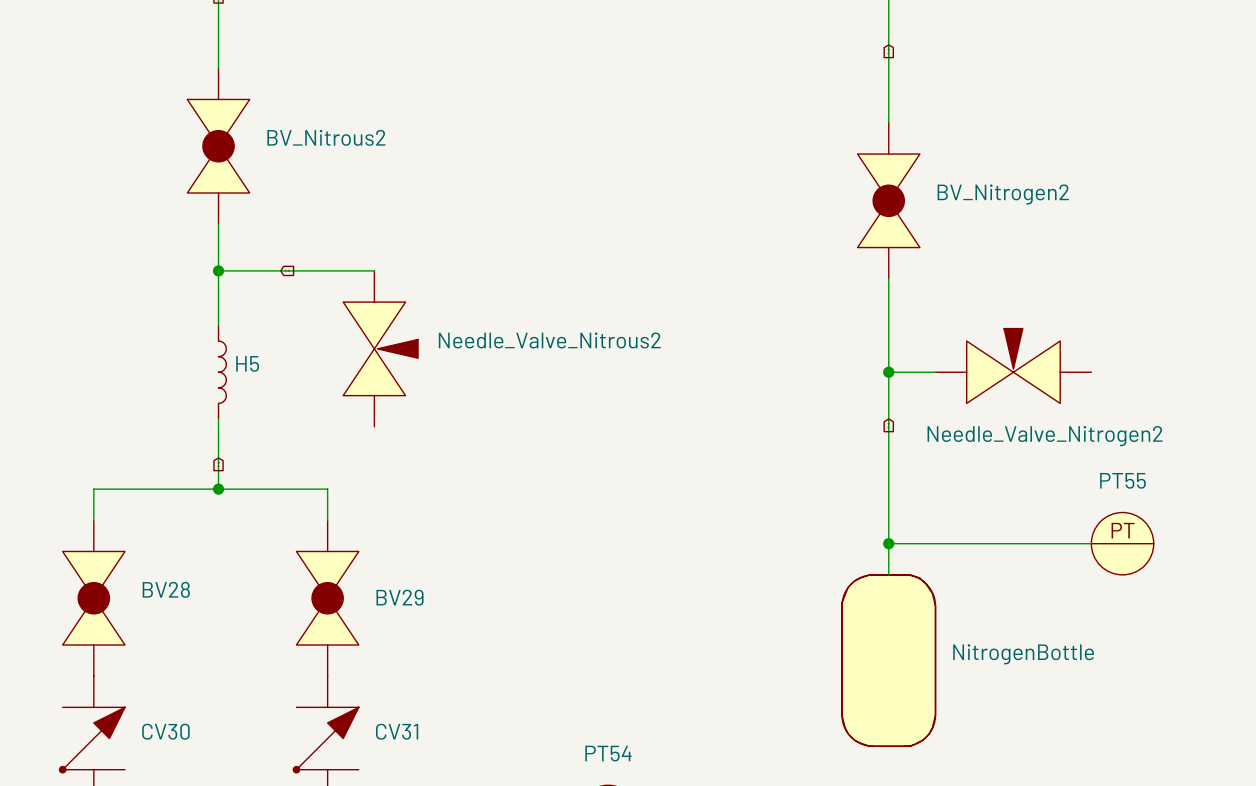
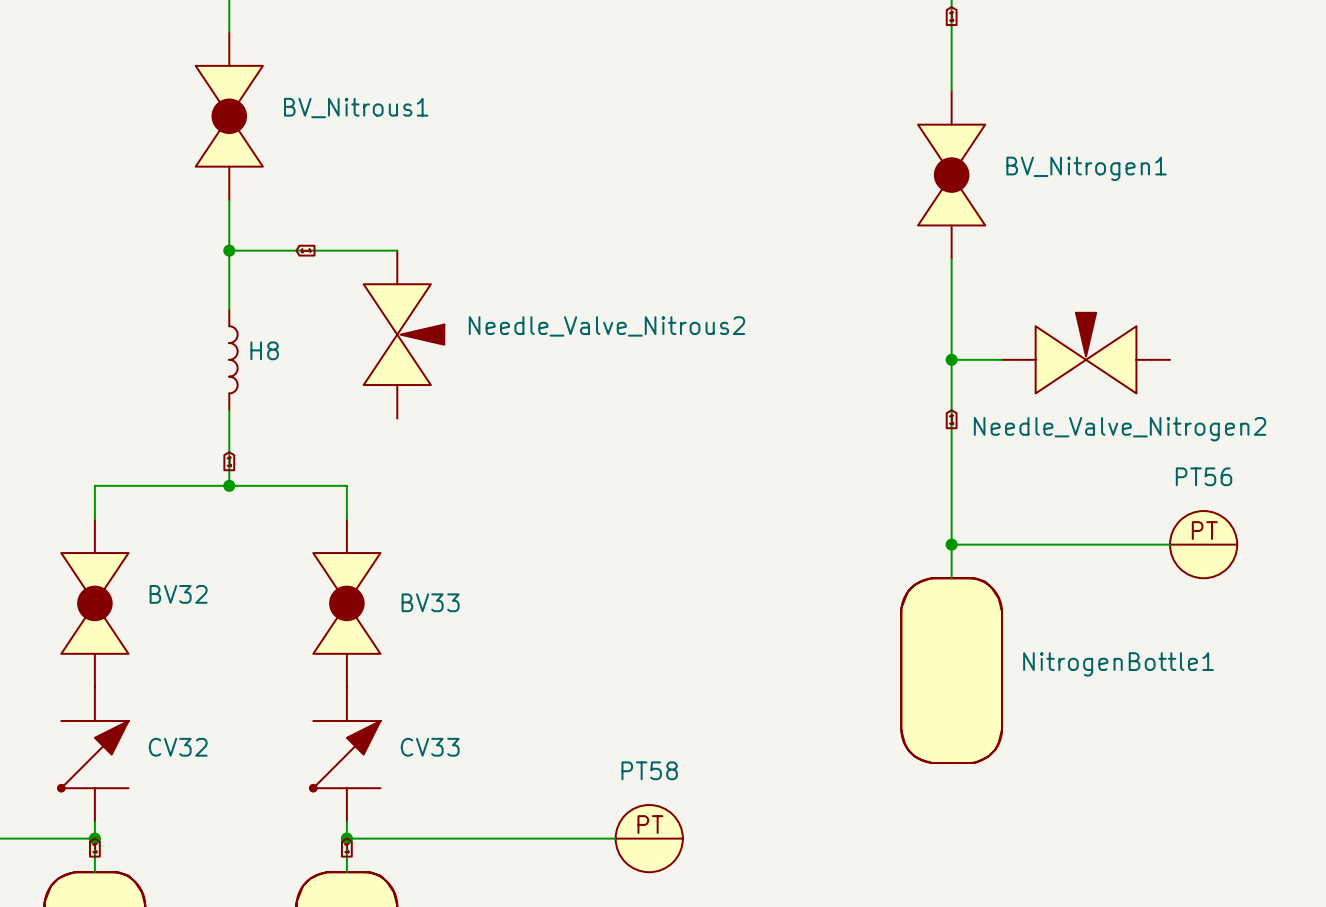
BV_Nitrous2 name: BV_Nitrous2 (326, 137) -> BV_Nitrous1 (356, 108)
BV_Nitrogen2 name: BV_Nitrogen2 (1003, 194) -> BV_Nitrogen1 (1086, 168)
H5 name: H5 (247, 363) -> H8 (264, 350)
PT55 name: PT55 (1122, 480) -> PT56 (1204, 476)
BV28 name: BV28 (166, 589) -> BV32 (178, 594)
BV29 name: BV29 (400, 597) -> BV33 (430, 602)
NitrogenBottle name: NitrogenBottle (1023, 654) -> NitrogenBottle1 (1118, 664)
CV30 name: CV30 (165, 731) -> CV32 (178, 747)
CV31 name: CV31 (397, 731) -> CV33 (430, 747)
PT54 name: PT54 (608, 753) -> PT58 (649, 770)

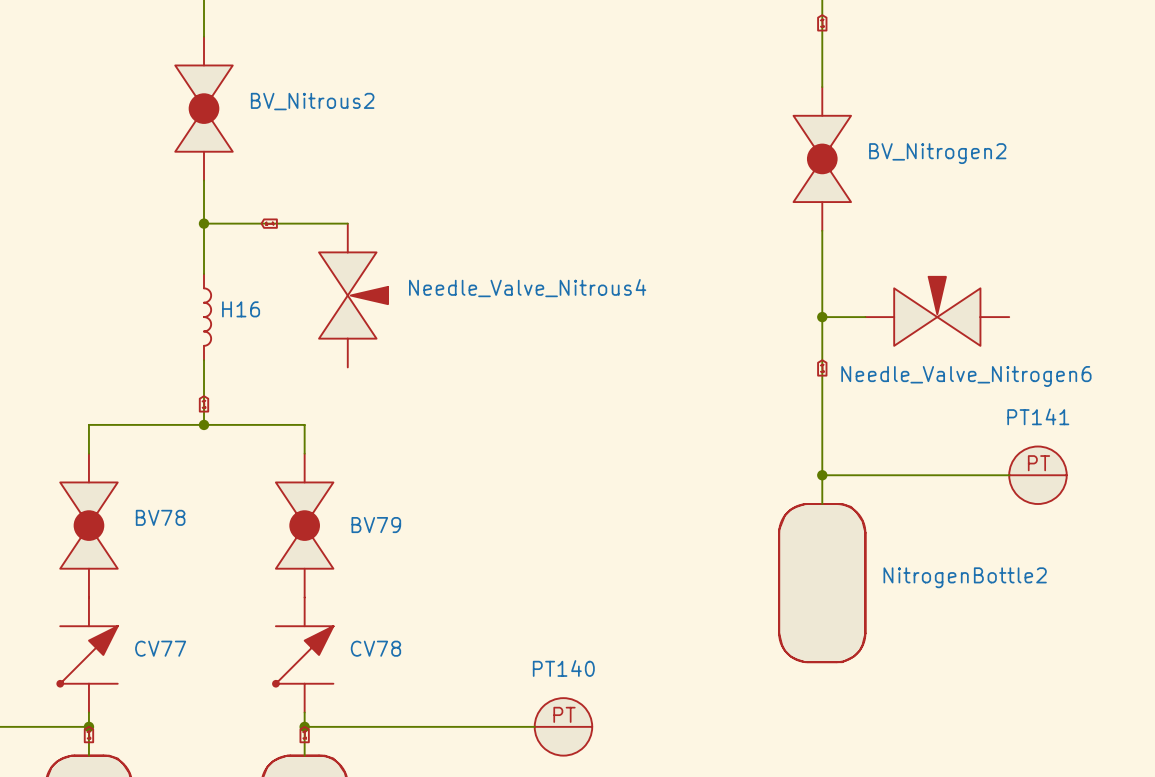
BV_Nitrous1 name: BV_Nitrous1 (356, 108) -> BV_Nitrous2 (312, 101)
BV_Nitrogen1 name: BV_Nitrogen1 (1086, 168) -> BV_Nitrogen2 (937, 153)
Needle_Valve_Nitrous2 name: Needle_Valve_Nitrous2 (606, 326) -> Needle_Valve_Nitrous4 (527, 288)
H8 name: H8 (264, 350) -> H16 (241, 309)
Needle_Valve_Nitrogen2 name: Needle_Valve_Nitrogen2 (1120, 429) -> Needle_Valve_Nitrogen6 (966, 376)
PT56 name: PT56 (1204, 476) -> PT141 (1038, 416)
BV32 name: BV32 (178, 594) -> BV78 (160, 517)
BV33 name: BV33 (430, 602) -> BV79 (376, 525)
NitrogenBottle1 name: NitrogenBottle1 (1118, 664) -> NitrogenBottle2 (965, 577)
CV32 name: CV32 (178, 747) -> CV77 (160, 648)
CV33 name: CV33 (430, 747) -> CV78 (375, 648)
PT58 name: PT58 (649, 770) -> PT140 (563, 668)

